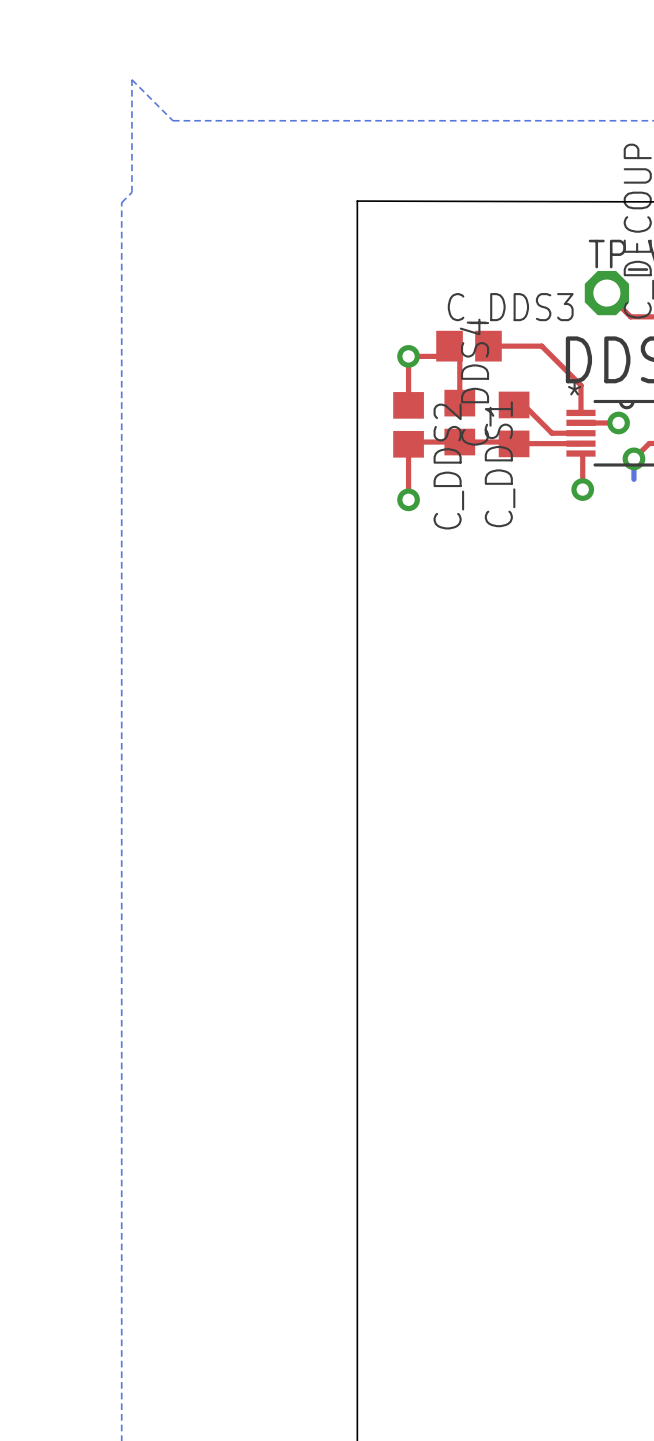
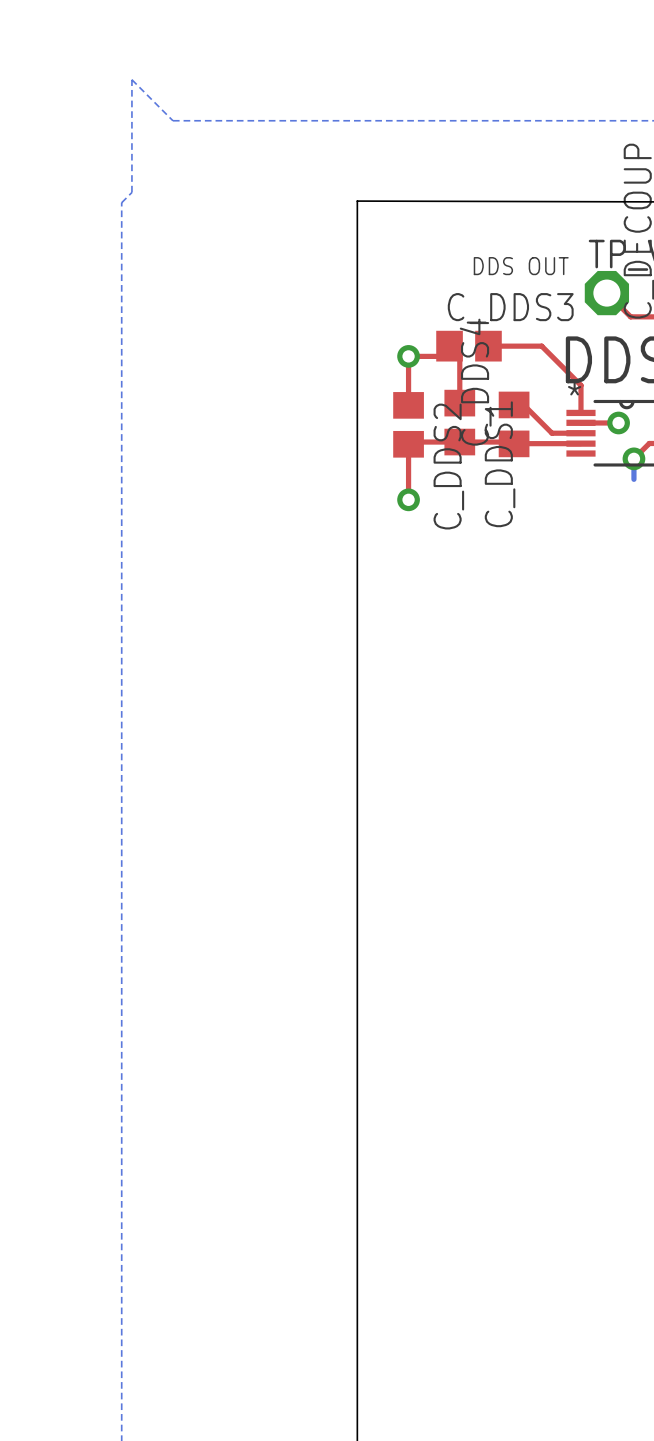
text: none -> DDS OUT (521, 266)
top track: (580, 453) (582, 455) (582, 489) -> none
via: (582, 489) -> none

